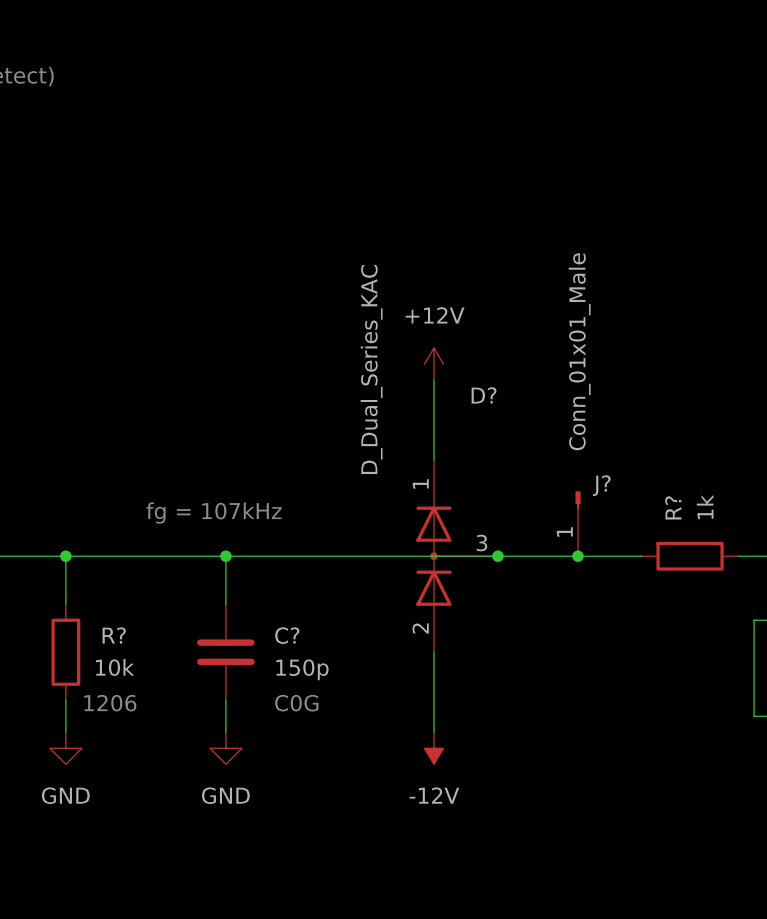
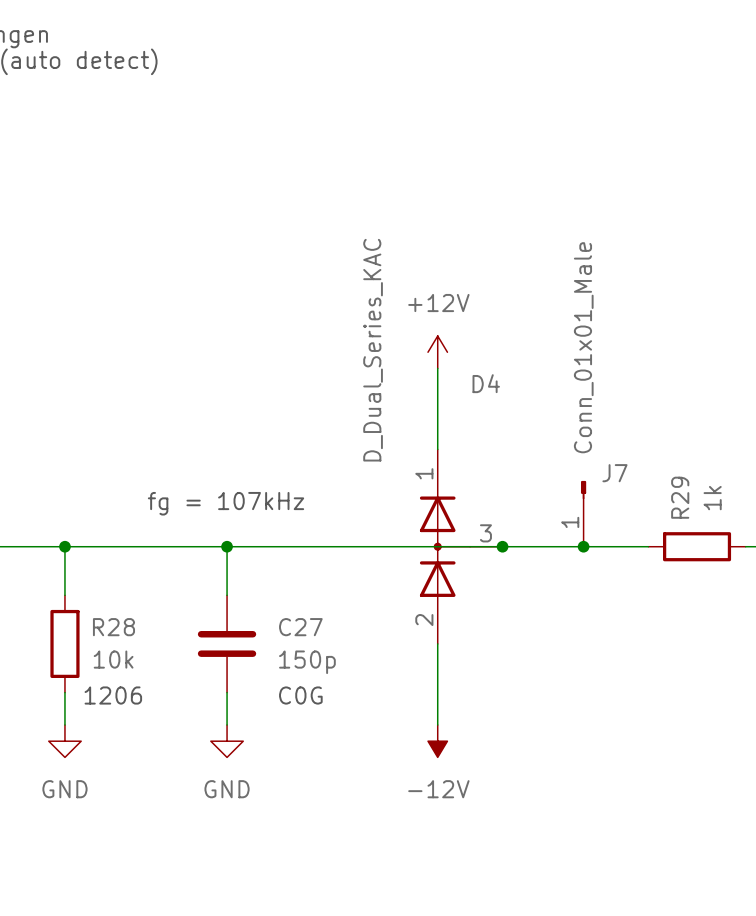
D? name: D? (484, 395) -> D4 (486, 383)
J? name: J? (601, 485) -> J7 (614, 473)
R? name: R? (673, 507) -> R29 (680, 497)
R? name: R? (114, 635) -> R28 (113, 627)
C? name: C? (287, 635) -> C27 (300, 627)

